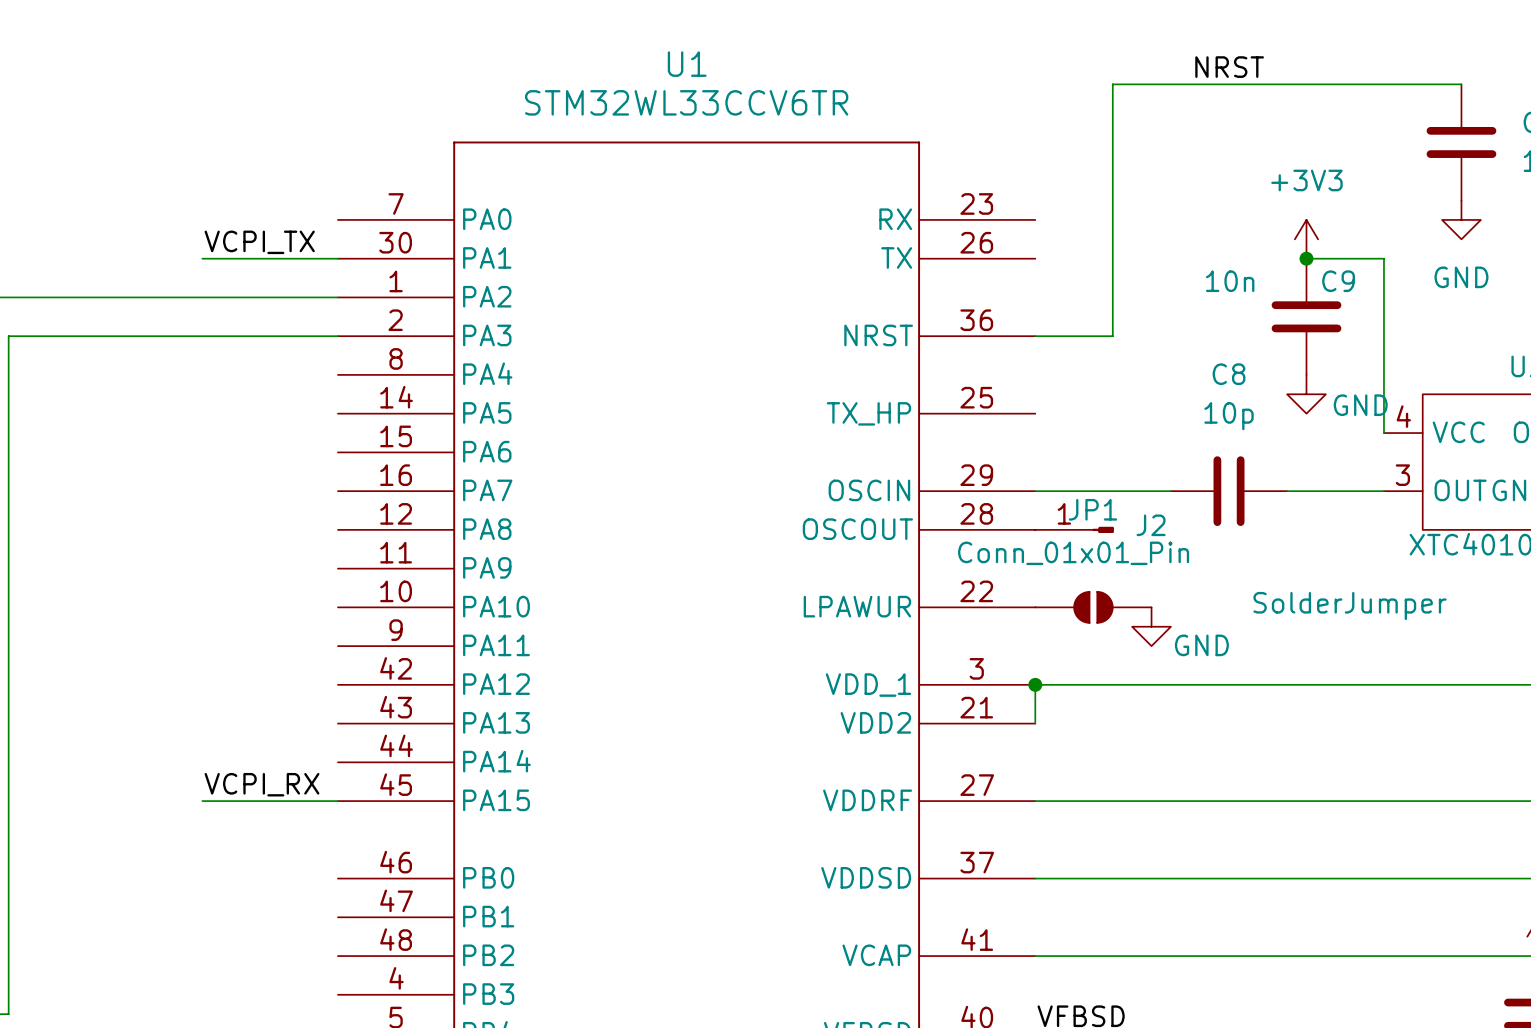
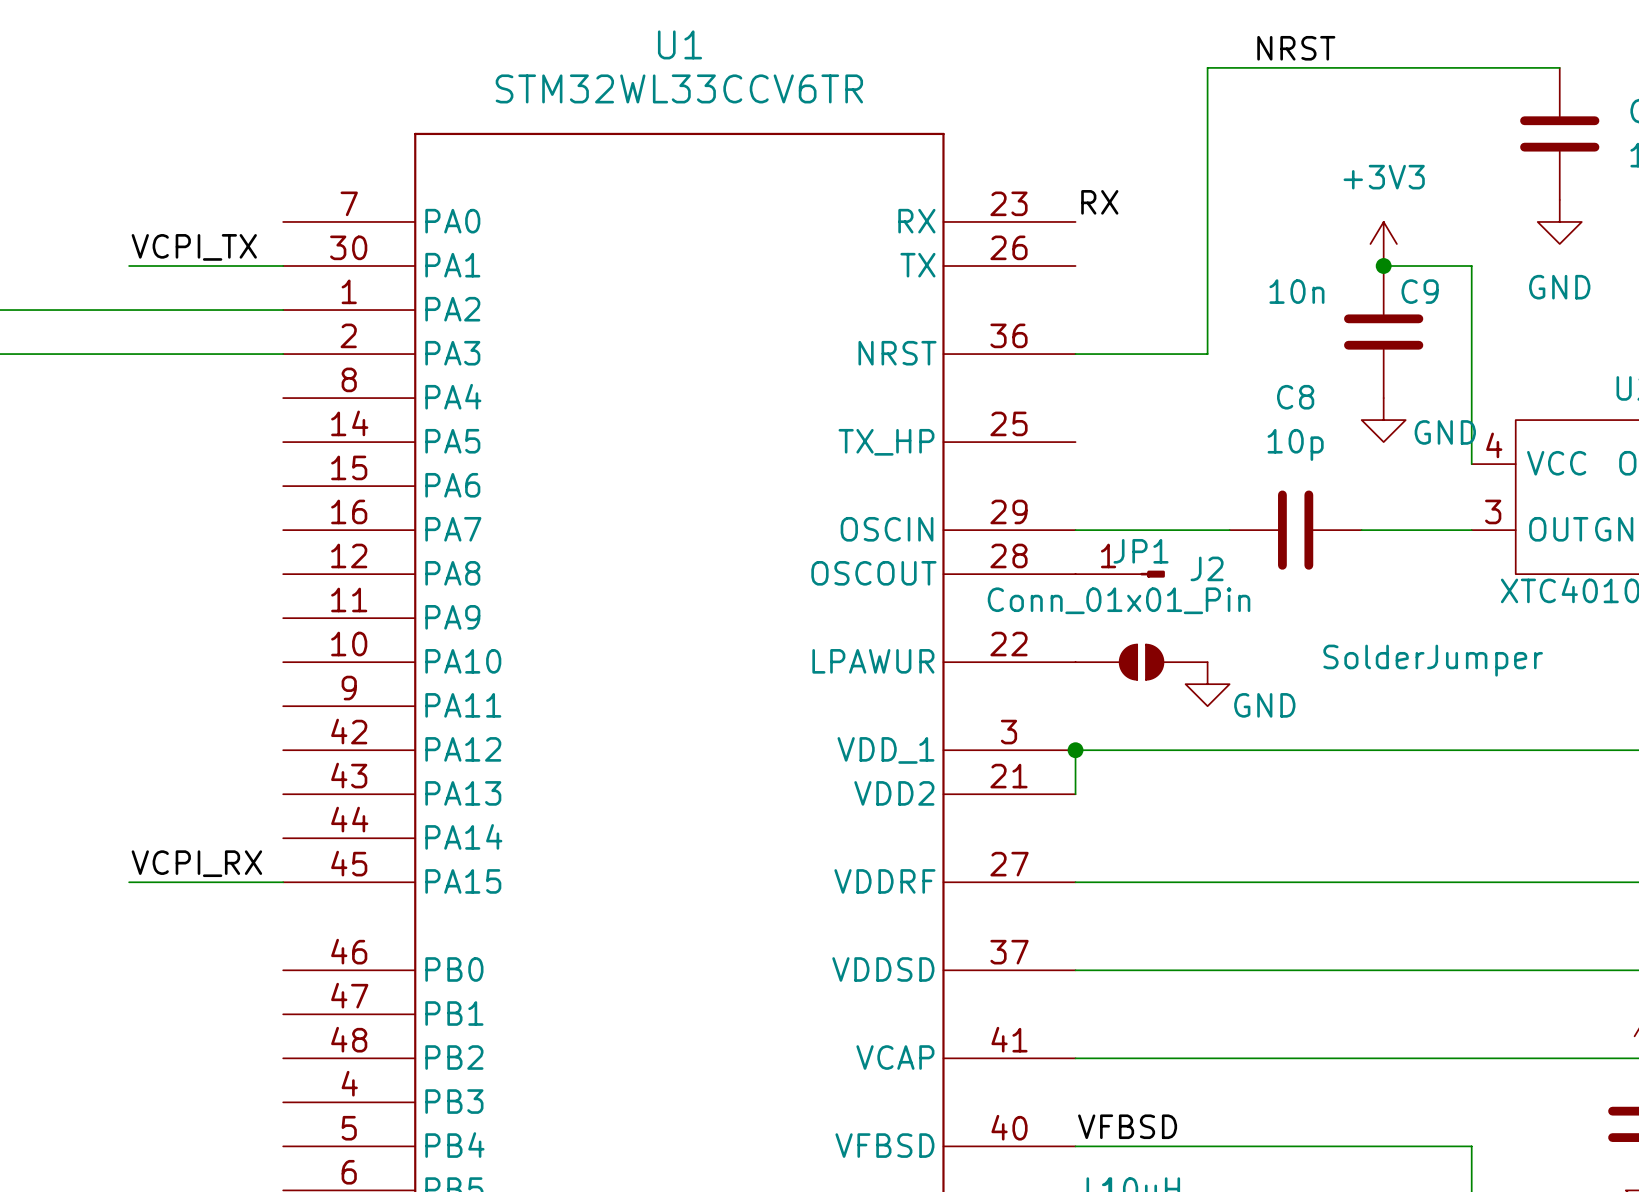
wire: (1151, 84) (1112, 84) (1112, 336) -> (1207, 67) (1207, 354) (1163, 354)
label: none -> RX (1099, 202)

